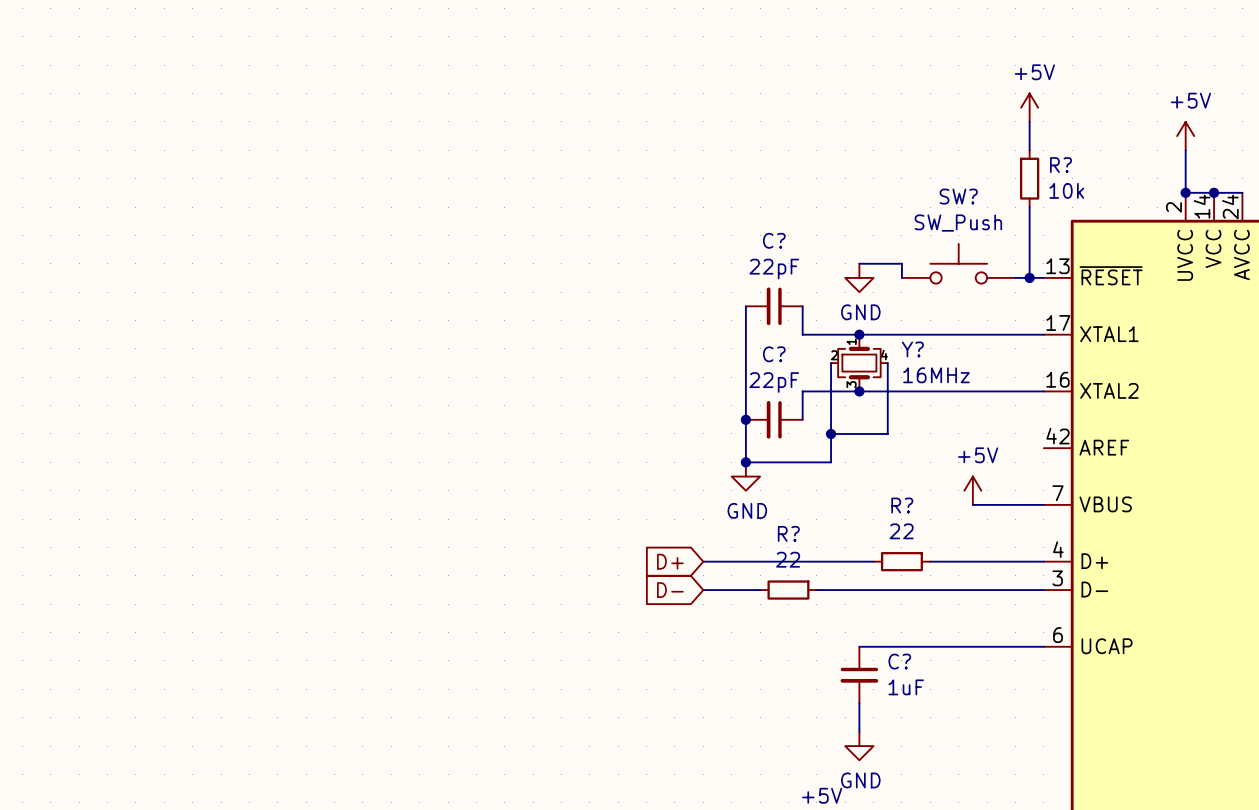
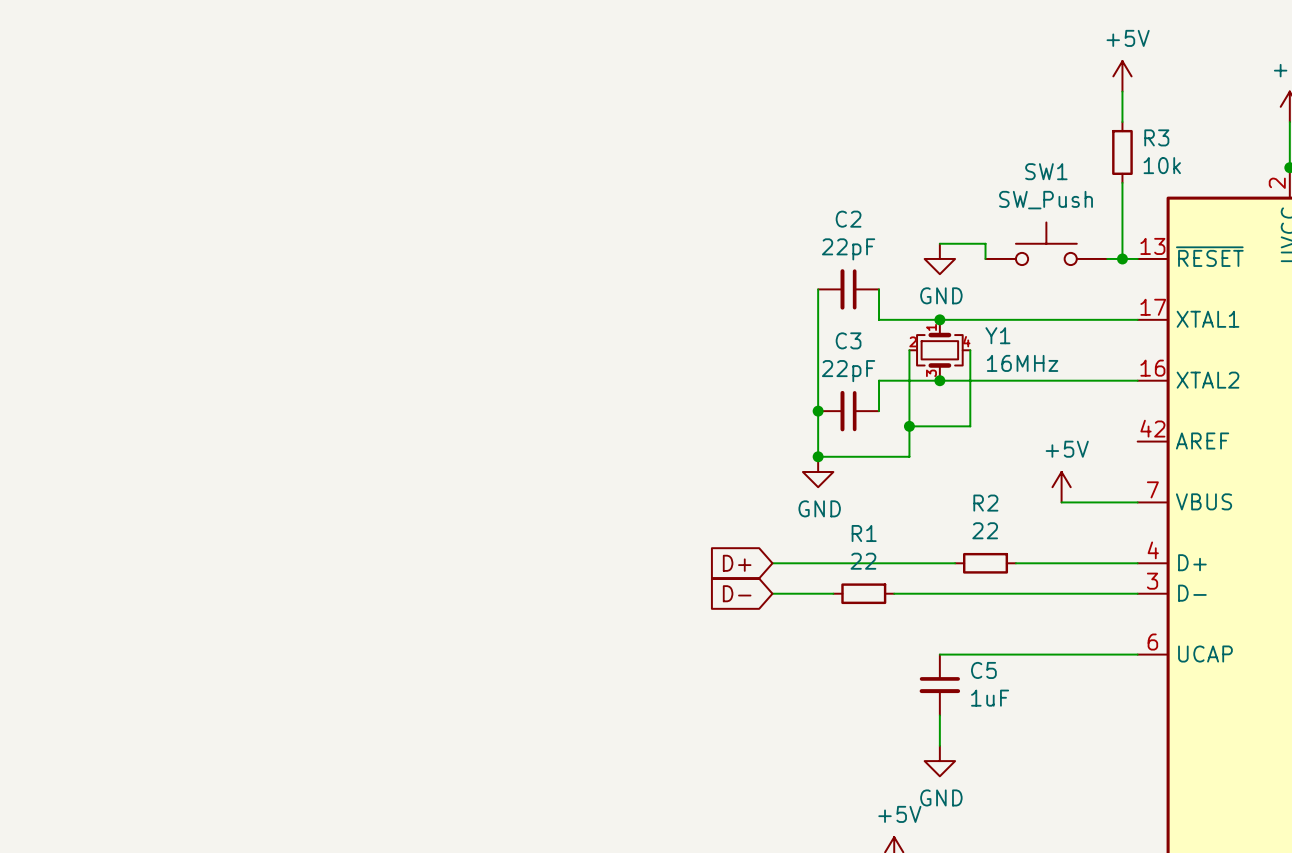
R? name: R? (1061, 165) -> R3 (1156, 137)
SW? name: SW? (958, 196) -> SW1 (1046, 171)
C? name: C? (774, 240) -> C2 (848, 219)
Y? name: Y? (912, 349) -> Y1 (997, 335)
C? name: C? (774, 354) -> C3 (848, 340)
R? name: R? (902, 505) -> R2 (985, 503)
R? name: R? (788, 533) -> R1 (864, 533)
C? name: C? (899, 661) -> C5 (983, 670)

